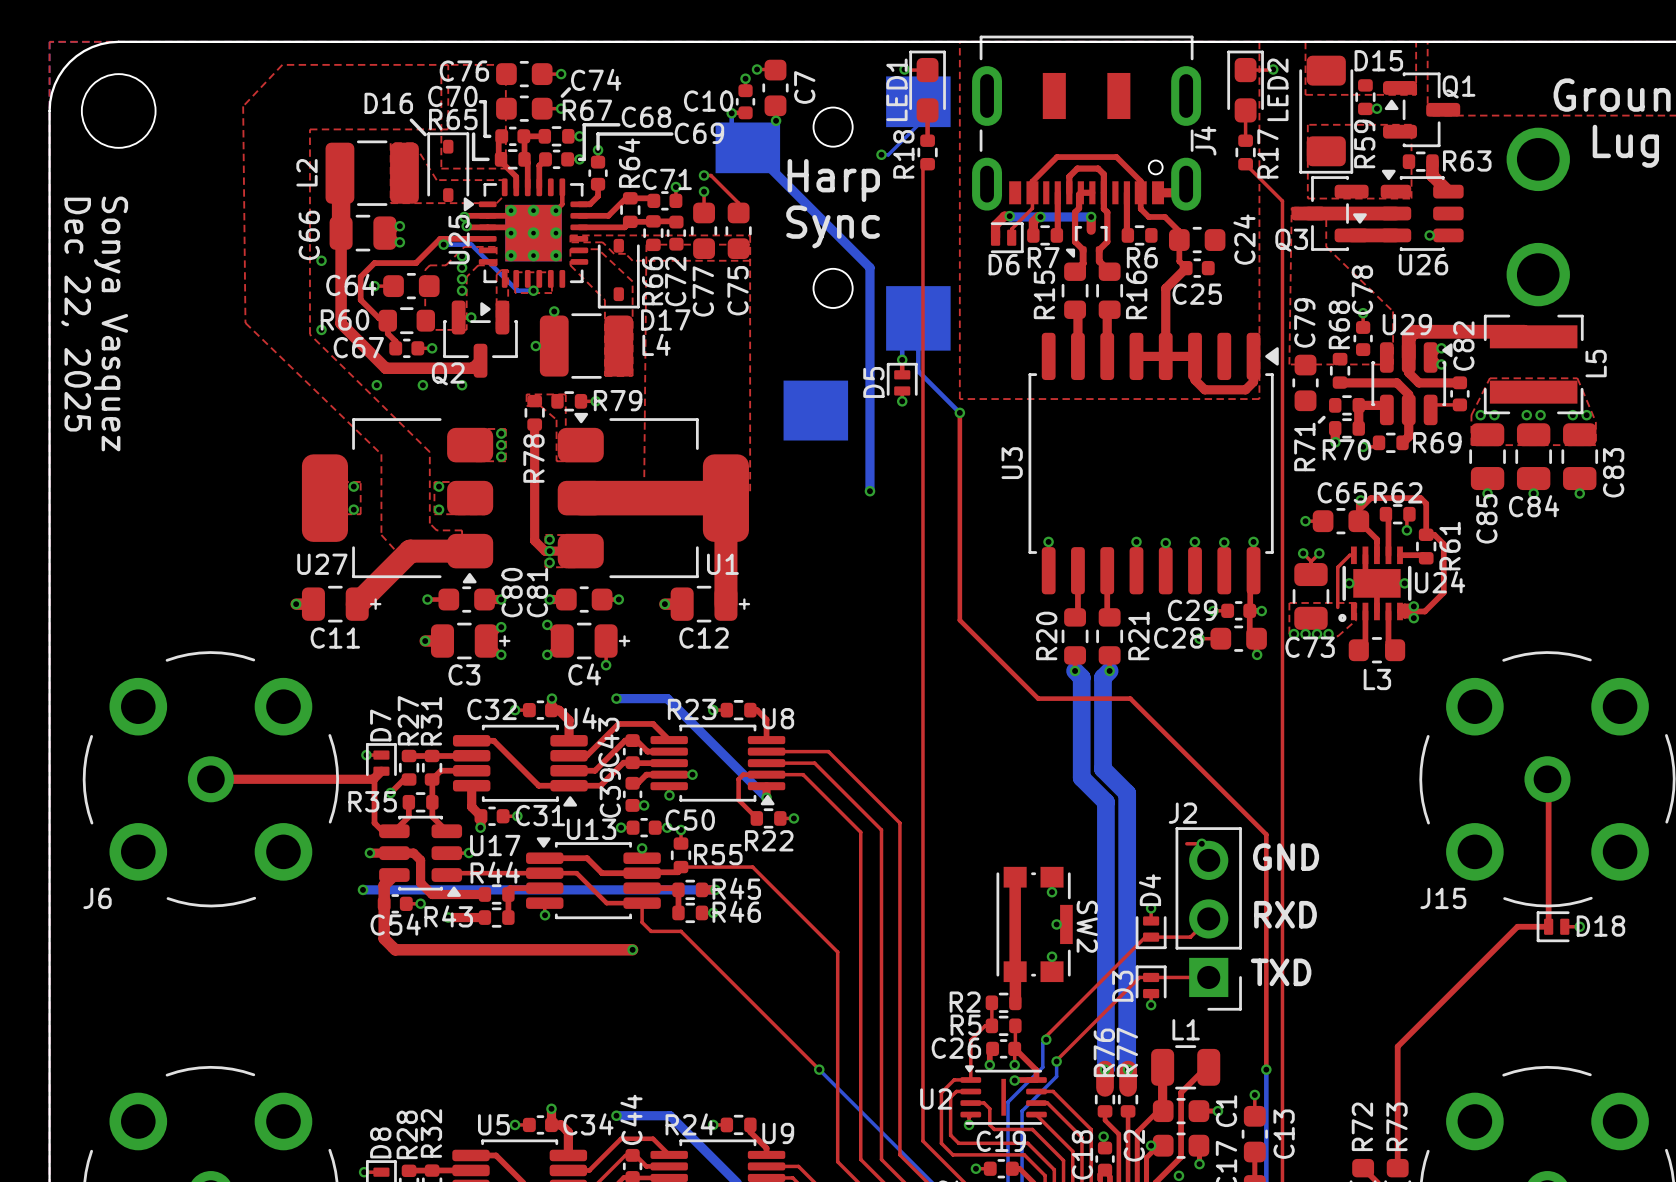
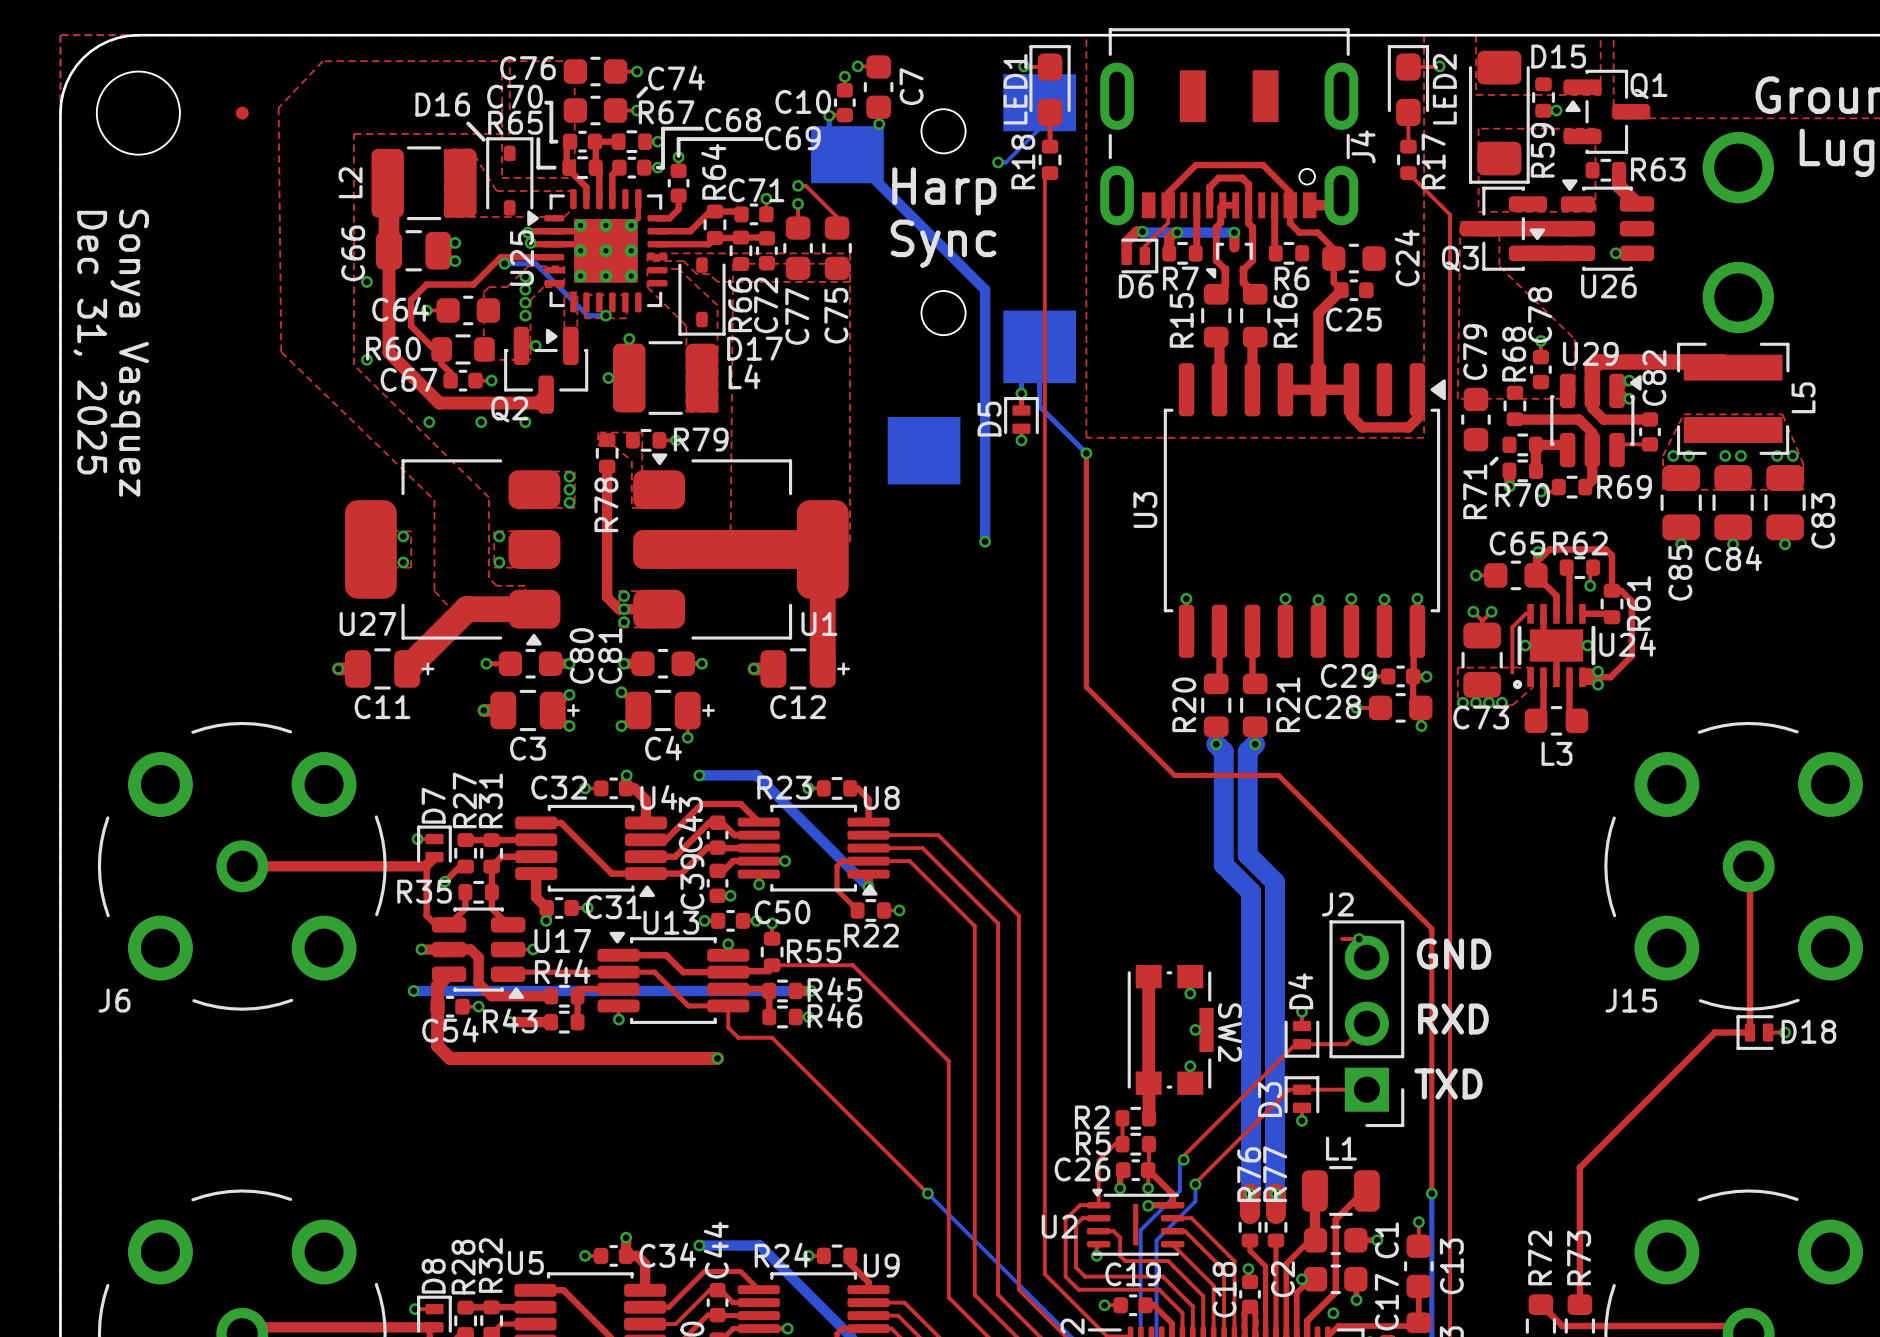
part: none -> (242, 113)
text: Dec 22, 2025 (76, 314) -> Dec 31, 2025 (90, 342)
U5 name position: U5 (493, 1124) -> U5 (525, 1262)

